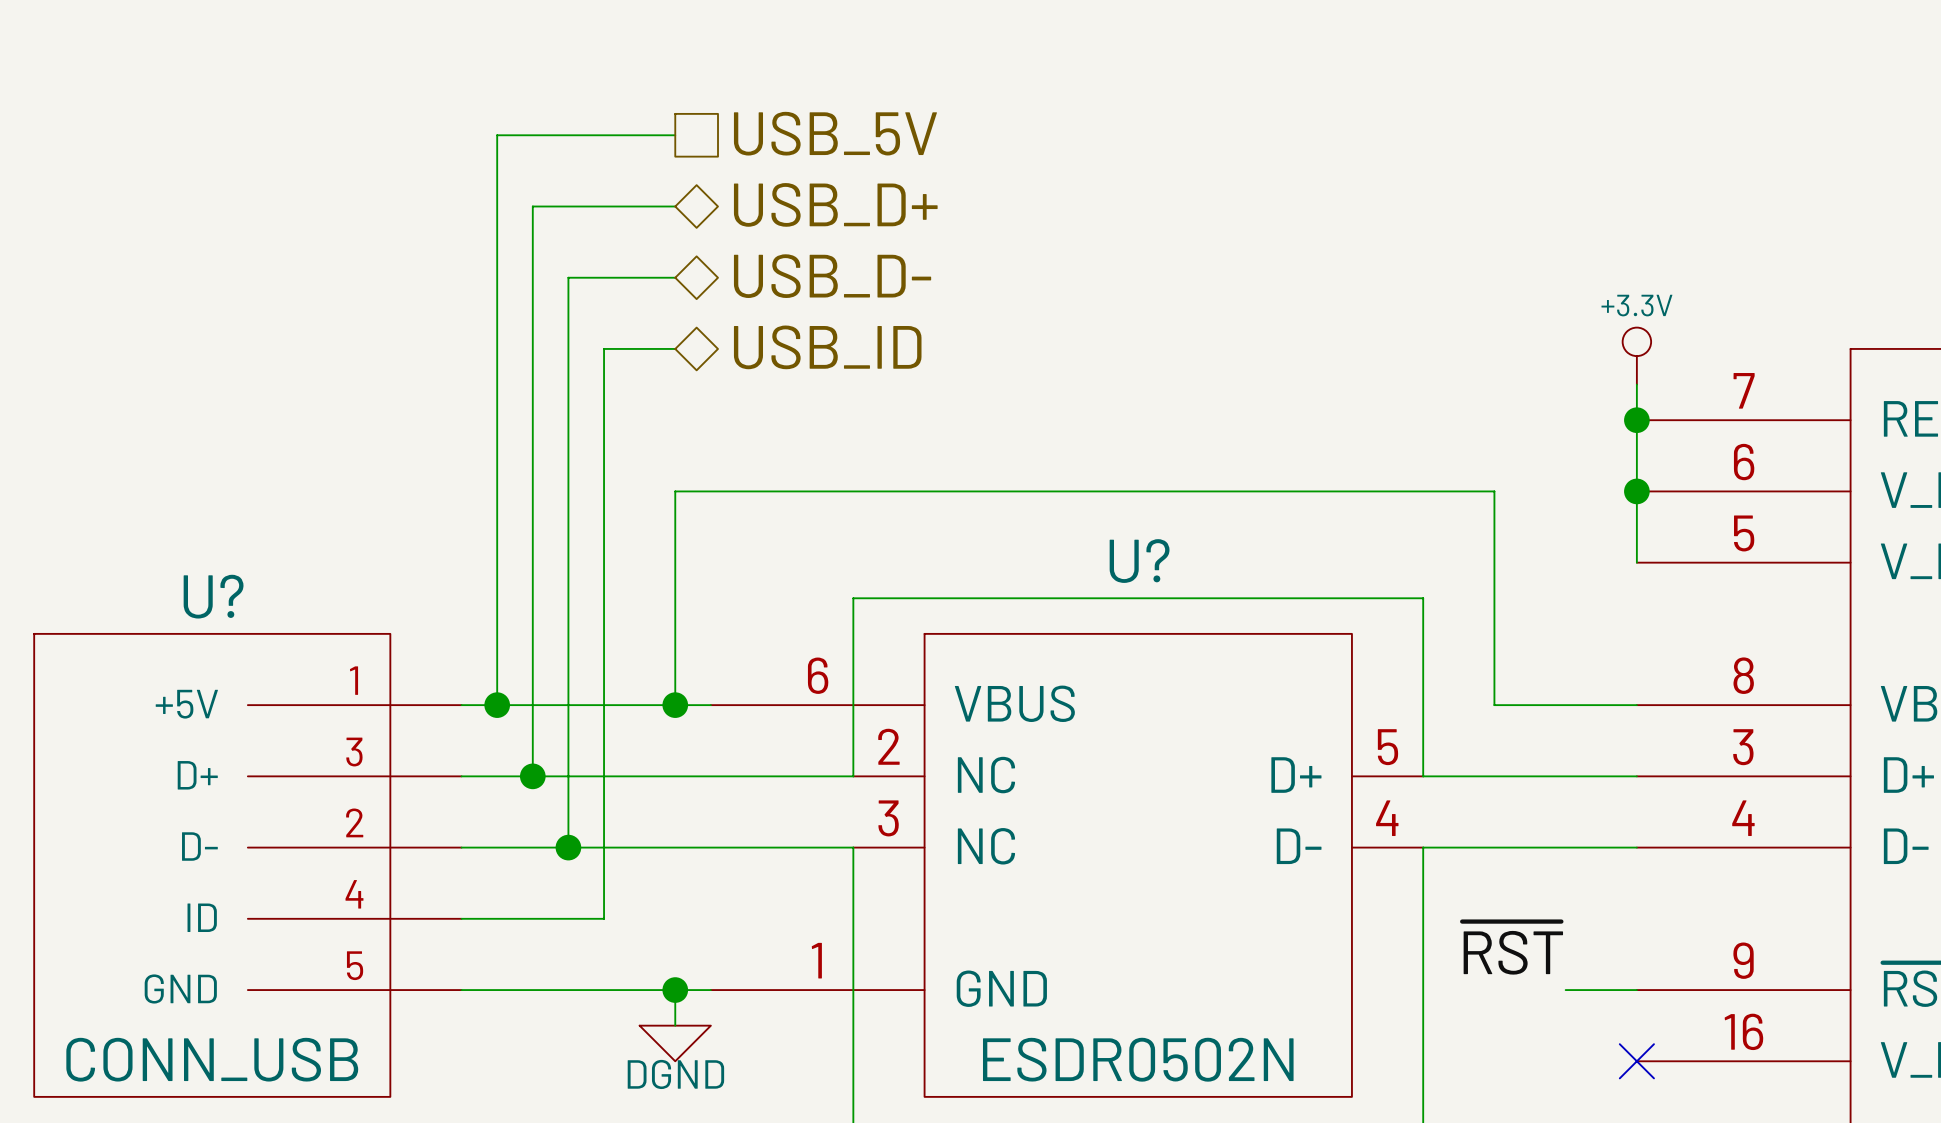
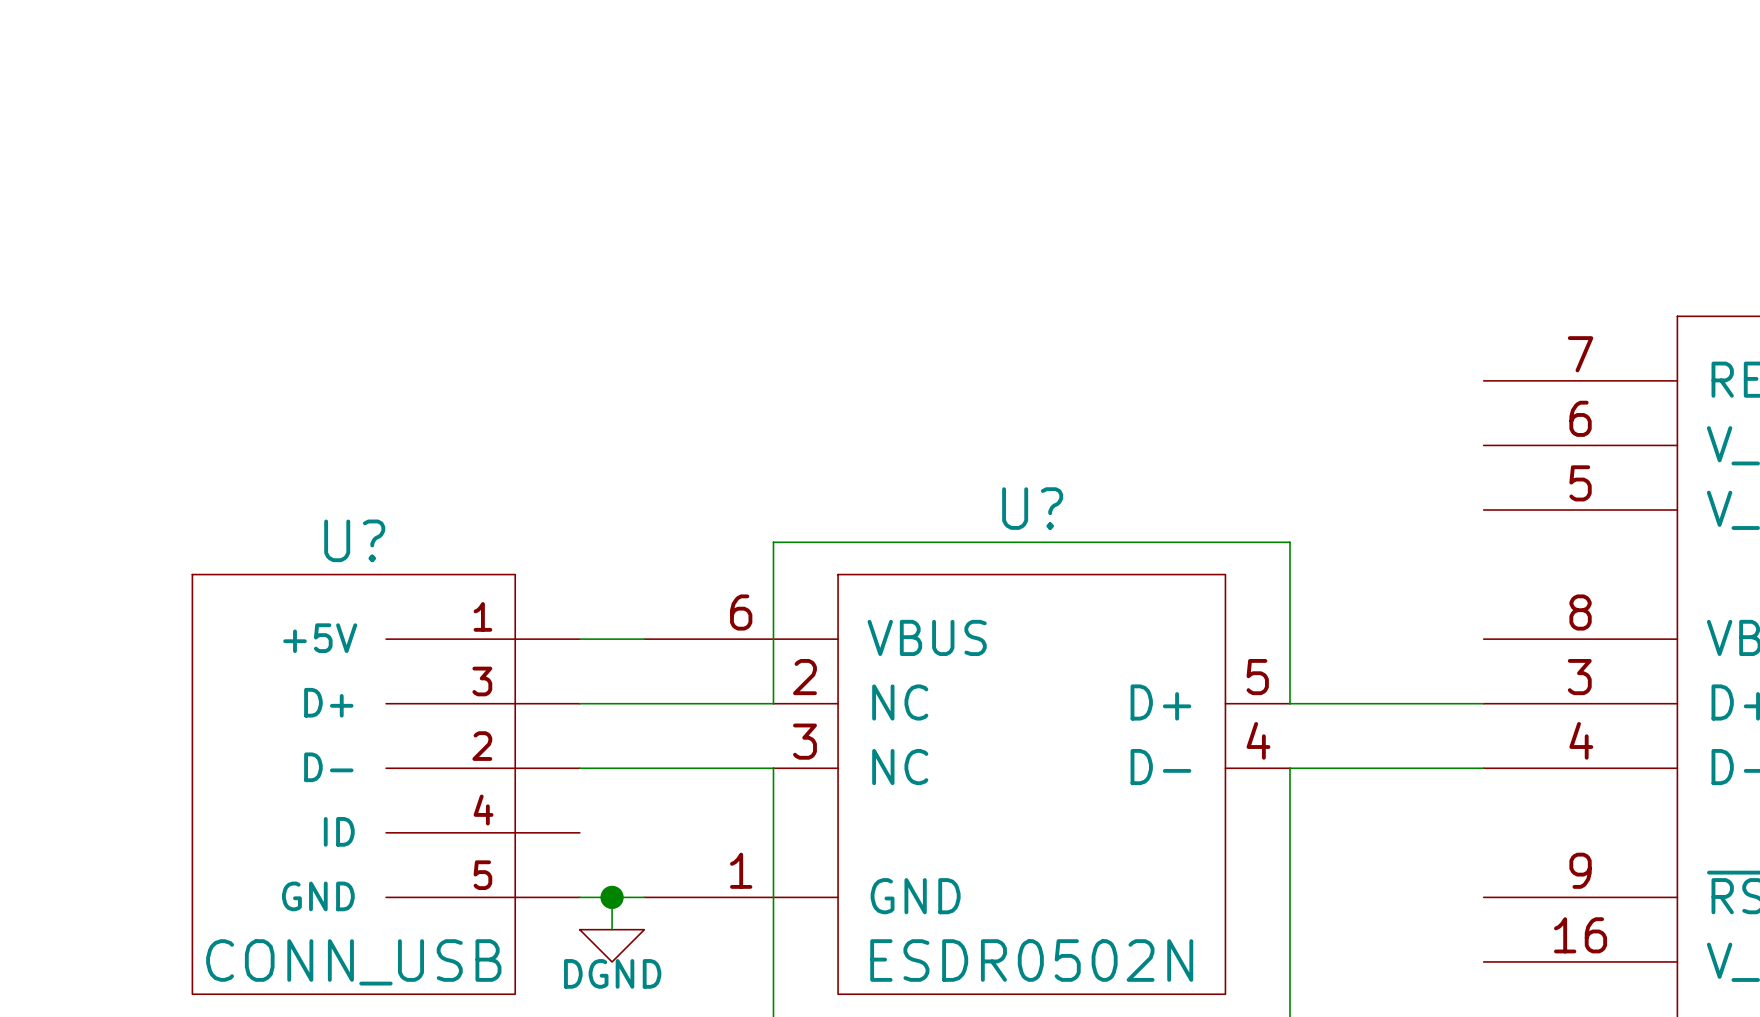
hierarchical label: USB_5V (835, 133) -> none
wire: (675, 135) (497, 135) (497, 705) -> none
hierarchical label: USB_D+ (835, 204) -> none
wire: (675, 206) (532, 206) (532, 776) -> none
hierarchical label: USB_D- (832, 276) -> none
wire: (675, 277) (568, 277) (568, 847) -> none
hierarchical label: USB_ID (827, 347) -> none
wire: (675, 348) (604, 348) (604, 918) (461, 918) -> none
power symbol: +3.3V (1636, 356) -> none
wire: (1636, 384) (1636, 562) -> none
junction: (1636, 420) -> none
junction: (1636, 491) -> none
junction: (497, 705) -> none
wire: (675, 705) (675, 491) (1494, 491) (1494, 705) (1636, 705) -> none
junction: (675, 705) -> none
junction: (532, 776) -> none
junction: (568, 847) -> none
U? position: (247, 865) -> (386, 784)
label: ~{RST} (1512, 948) -> none
wire: (1565, 990) (1636, 990) -> none
no-connect mark: (1636, 1061) -> none

